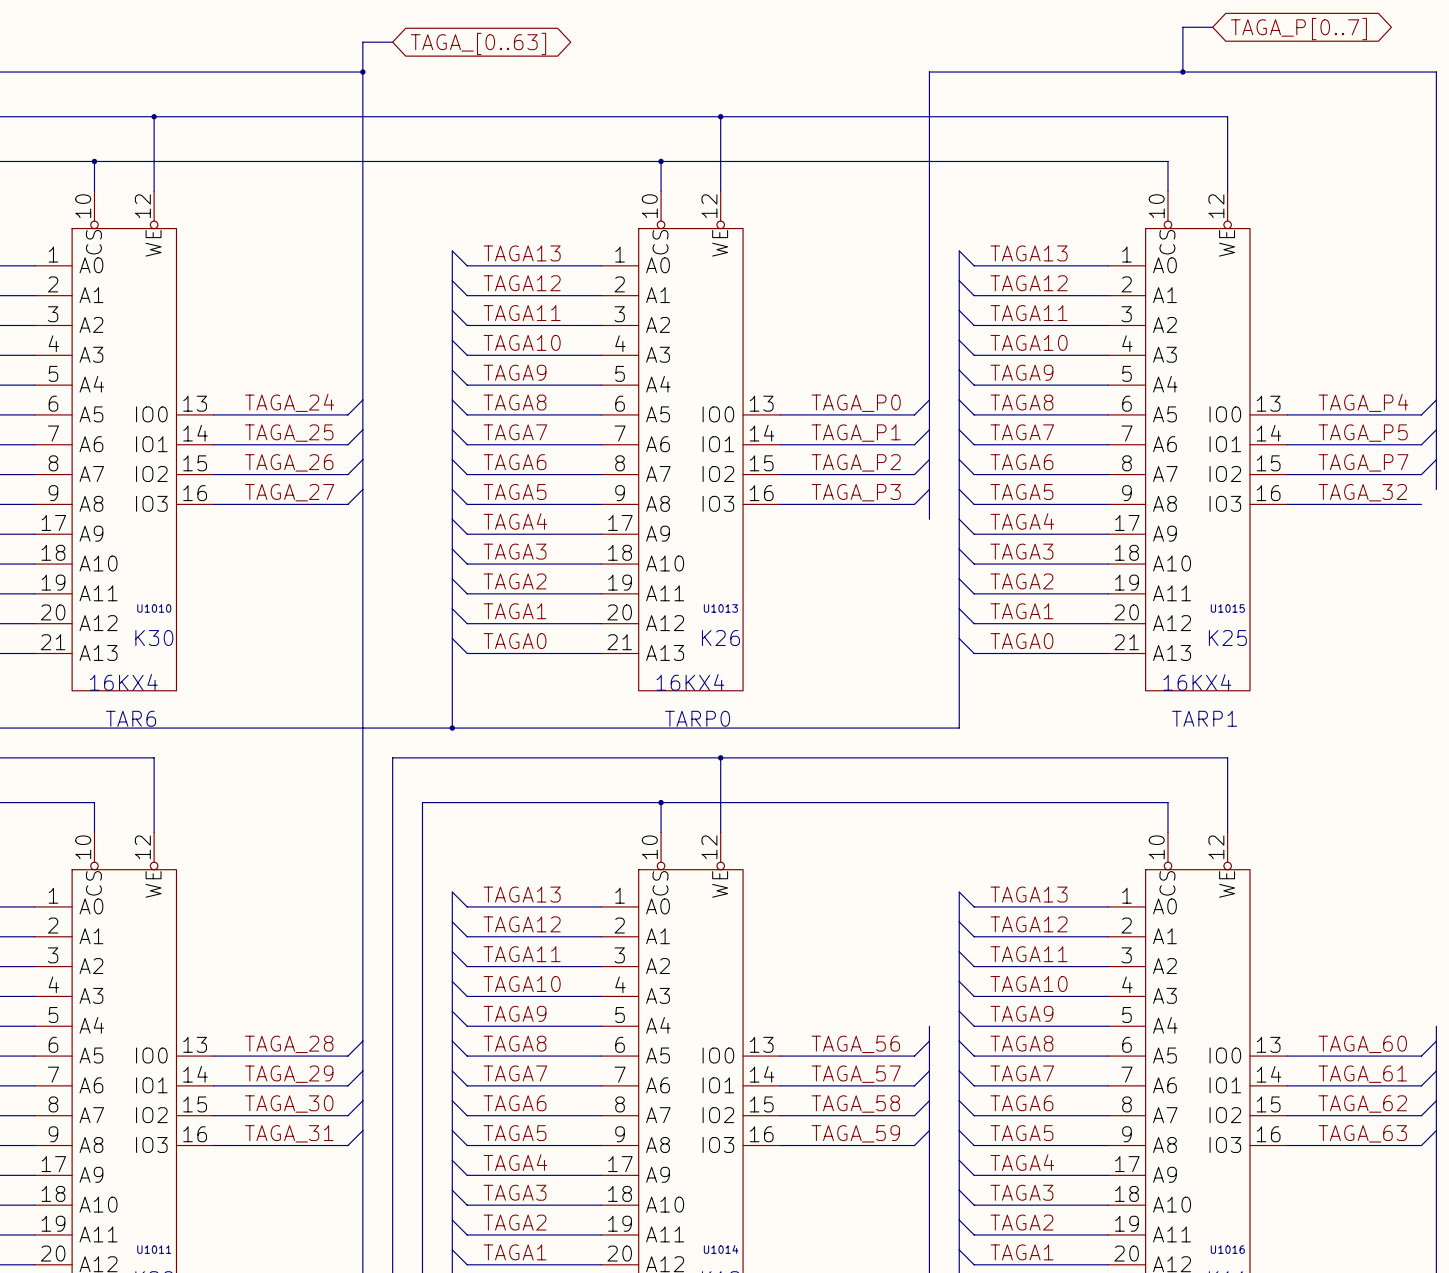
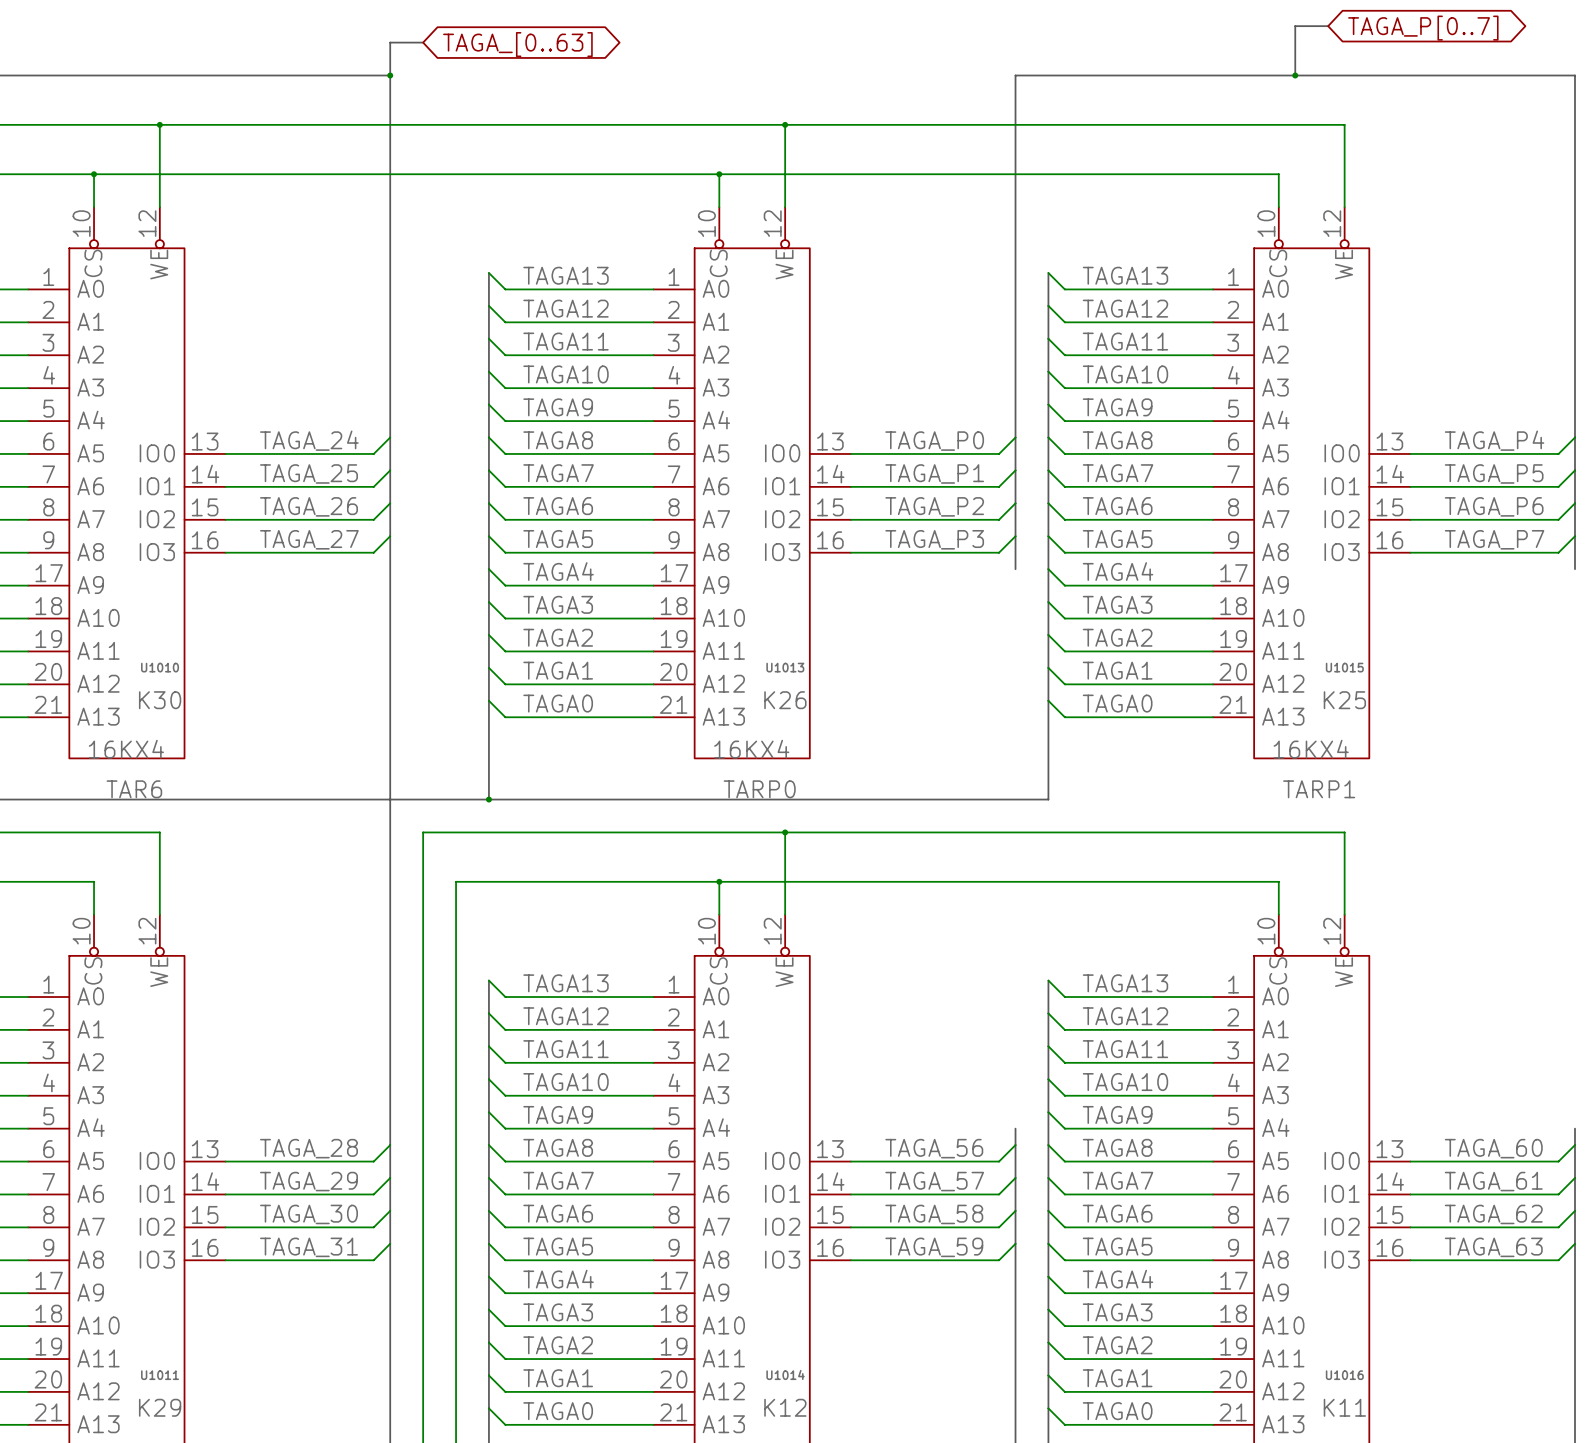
label: TAGA_P7 (1363, 462) -> TAGA_P6 (1494, 506)
bus: none -> (1574, 536) (1574, 569)
wire: none -> (1574, 536) (1558, 552)
label: TAGA_32 (1362, 492) -> TAGA_P7 (1494, 539)

